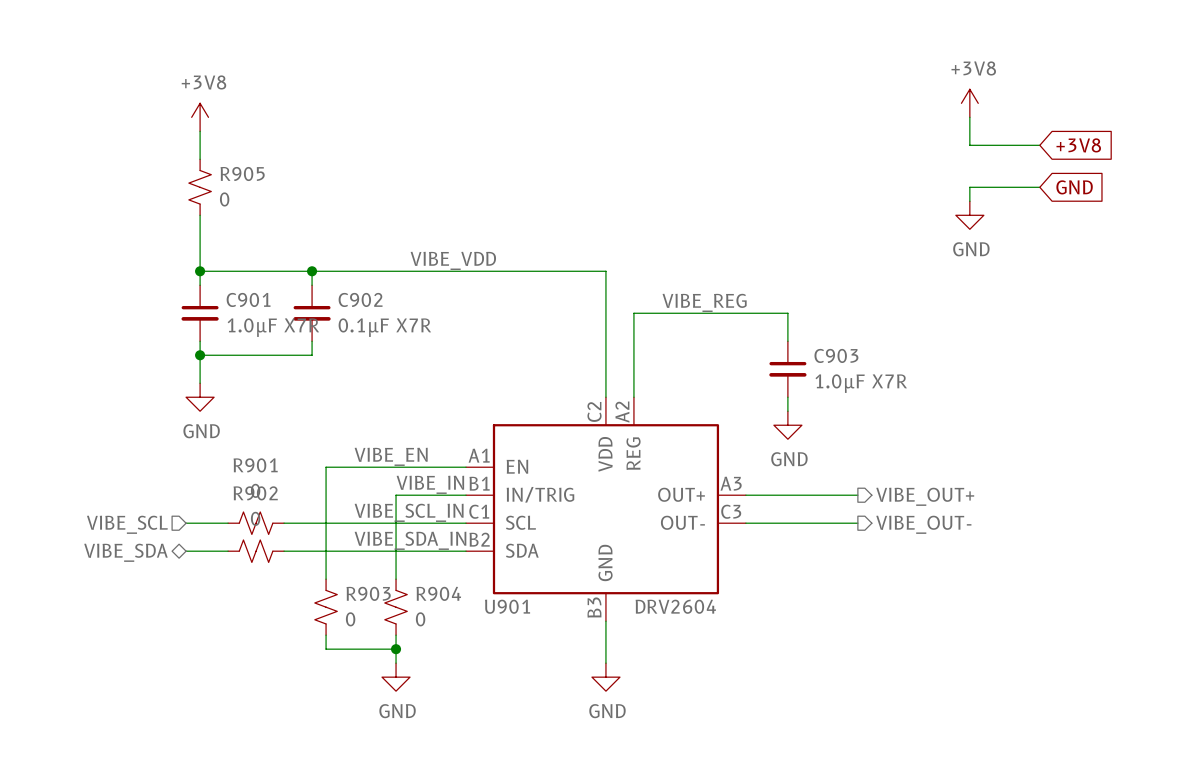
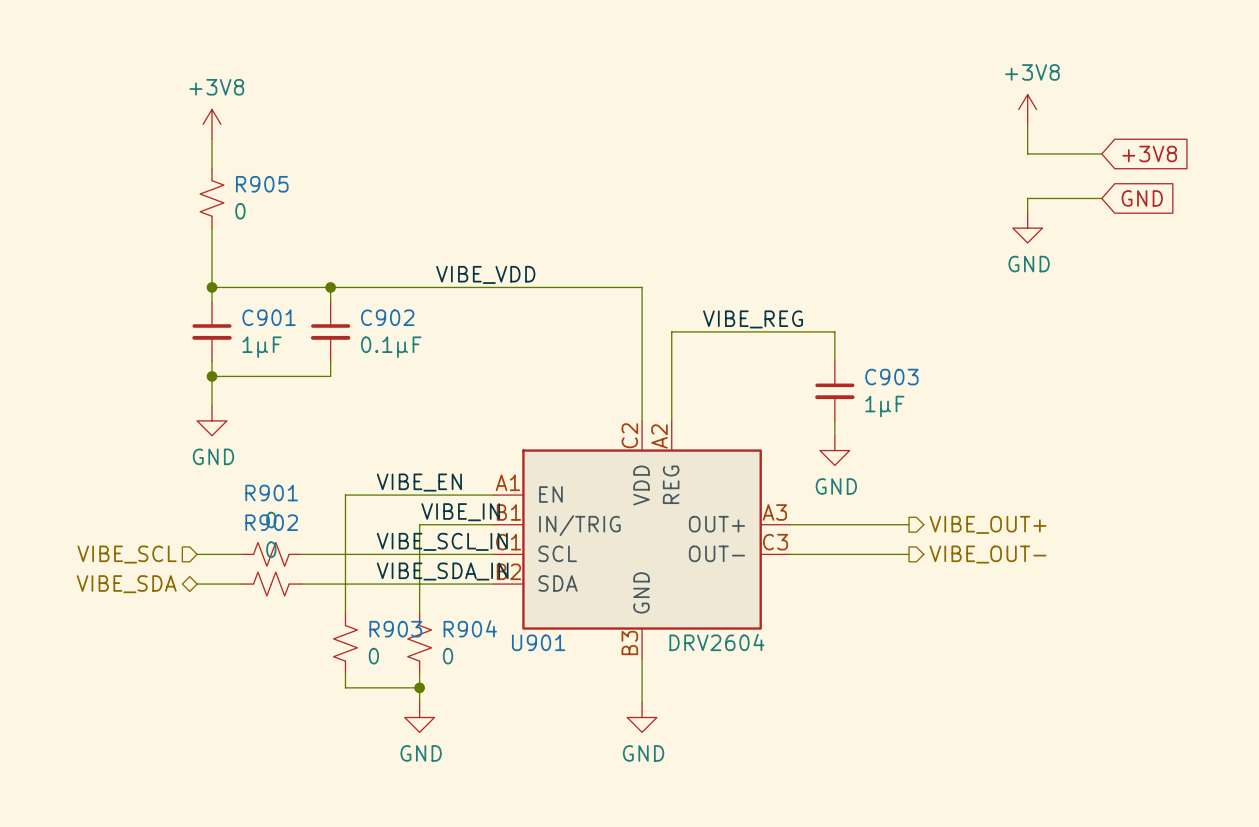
C901 value: 1.0µF X7R (273, 327) -> 1µF (262, 347)
C902 value: 0.1µF X7R (384, 327) -> 0.1µF (391, 347)
C903 value: 1.0µF X7R (861, 383) -> 1µF (884, 406)

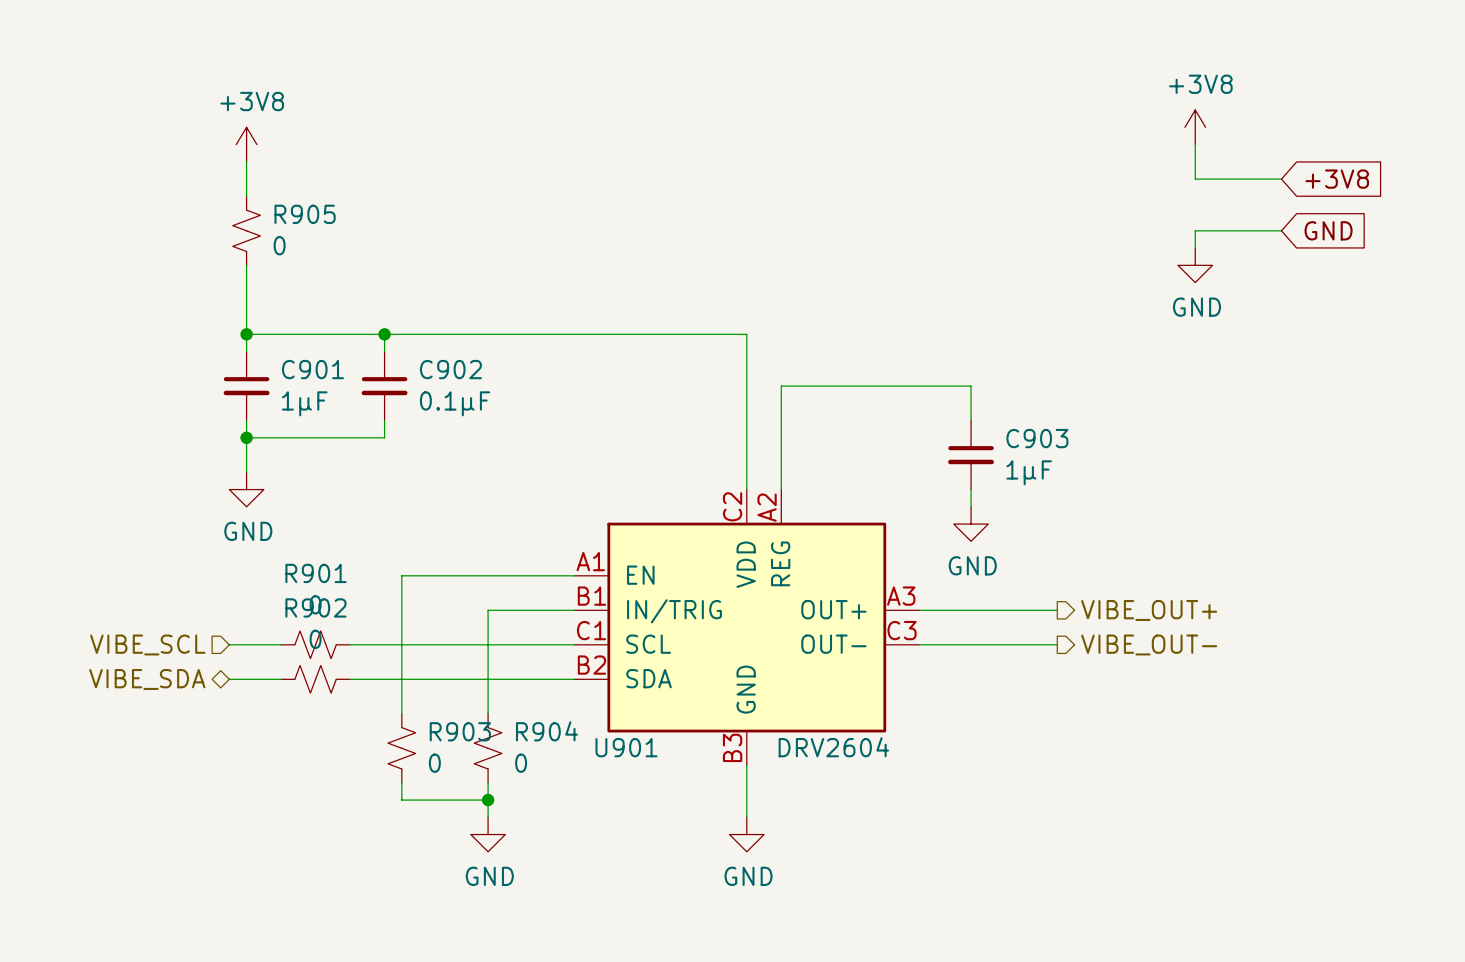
label: VIBE_VDD (485, 274) -> none
label: VIBE_REG (753, 319) -> none
label: VIBE_EN (419, 482) -> none
label: VIBE_IN (460, 512) -> none
label: VIBE_SCL_IN (442, 541) -> none
label: VIBE_SDA_IN (442, 571) -> none

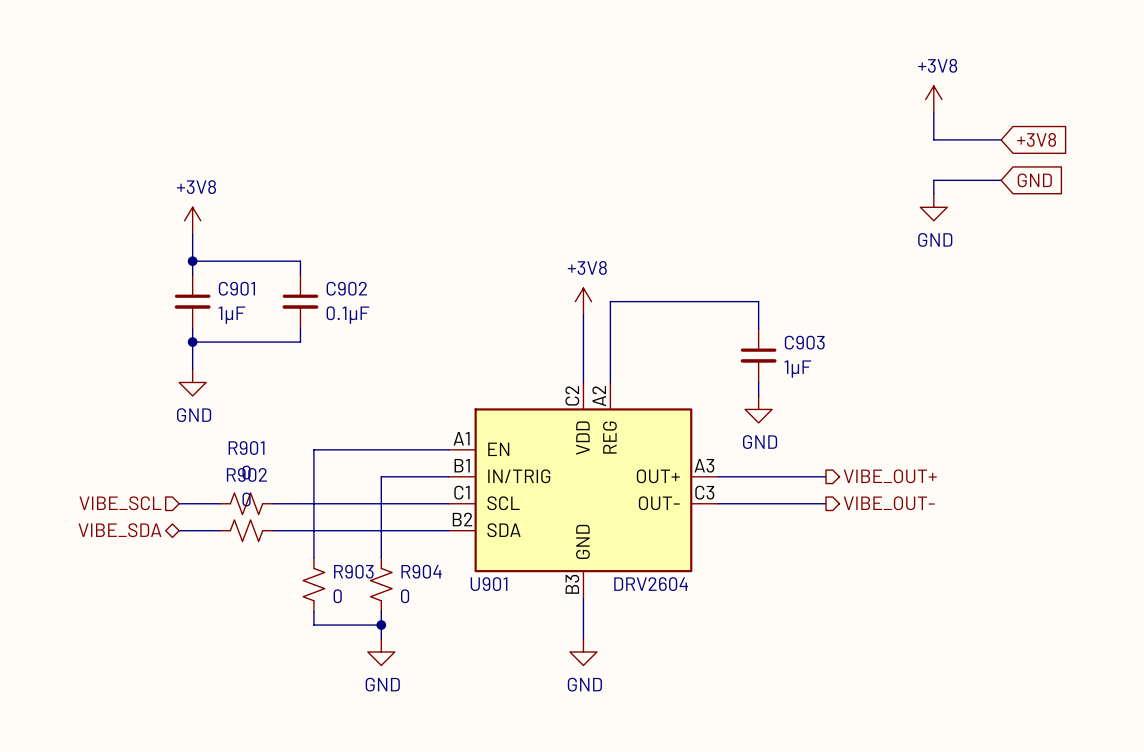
power symbol position: +3V8 (246, 144) -> +3V8 (192, 220)
wire: (246, 161) (246, 196) -> none
R905: 0 (246, 230) -> none
wire: (384, 334) (746, 334) (746, 403) -> none
junction: (384, 334) -> none
power symbol: none -> +3V8 (583, 301)

